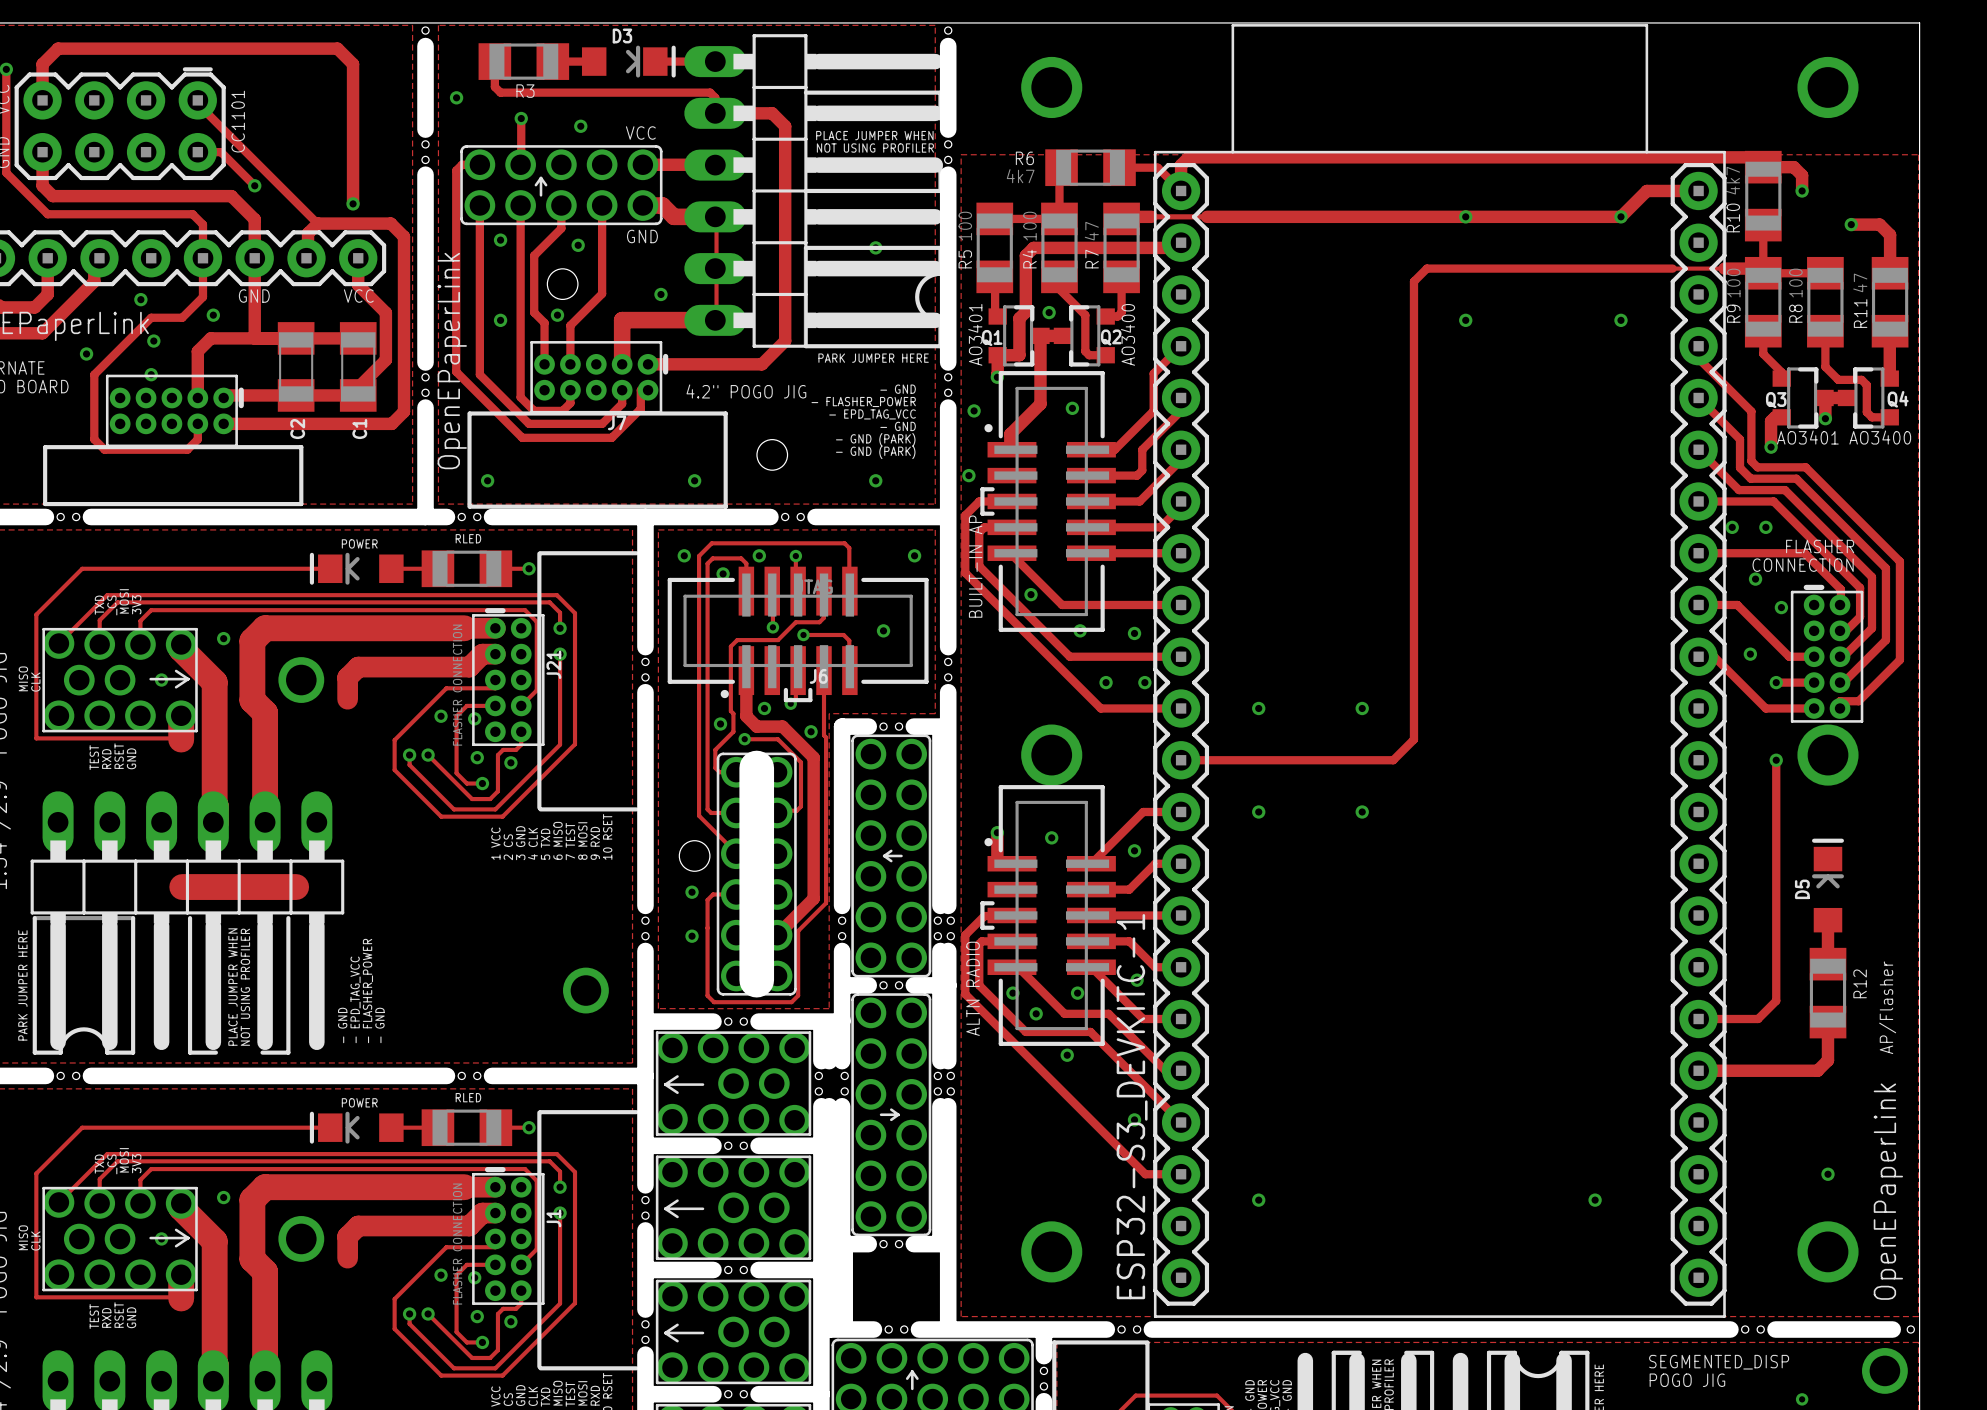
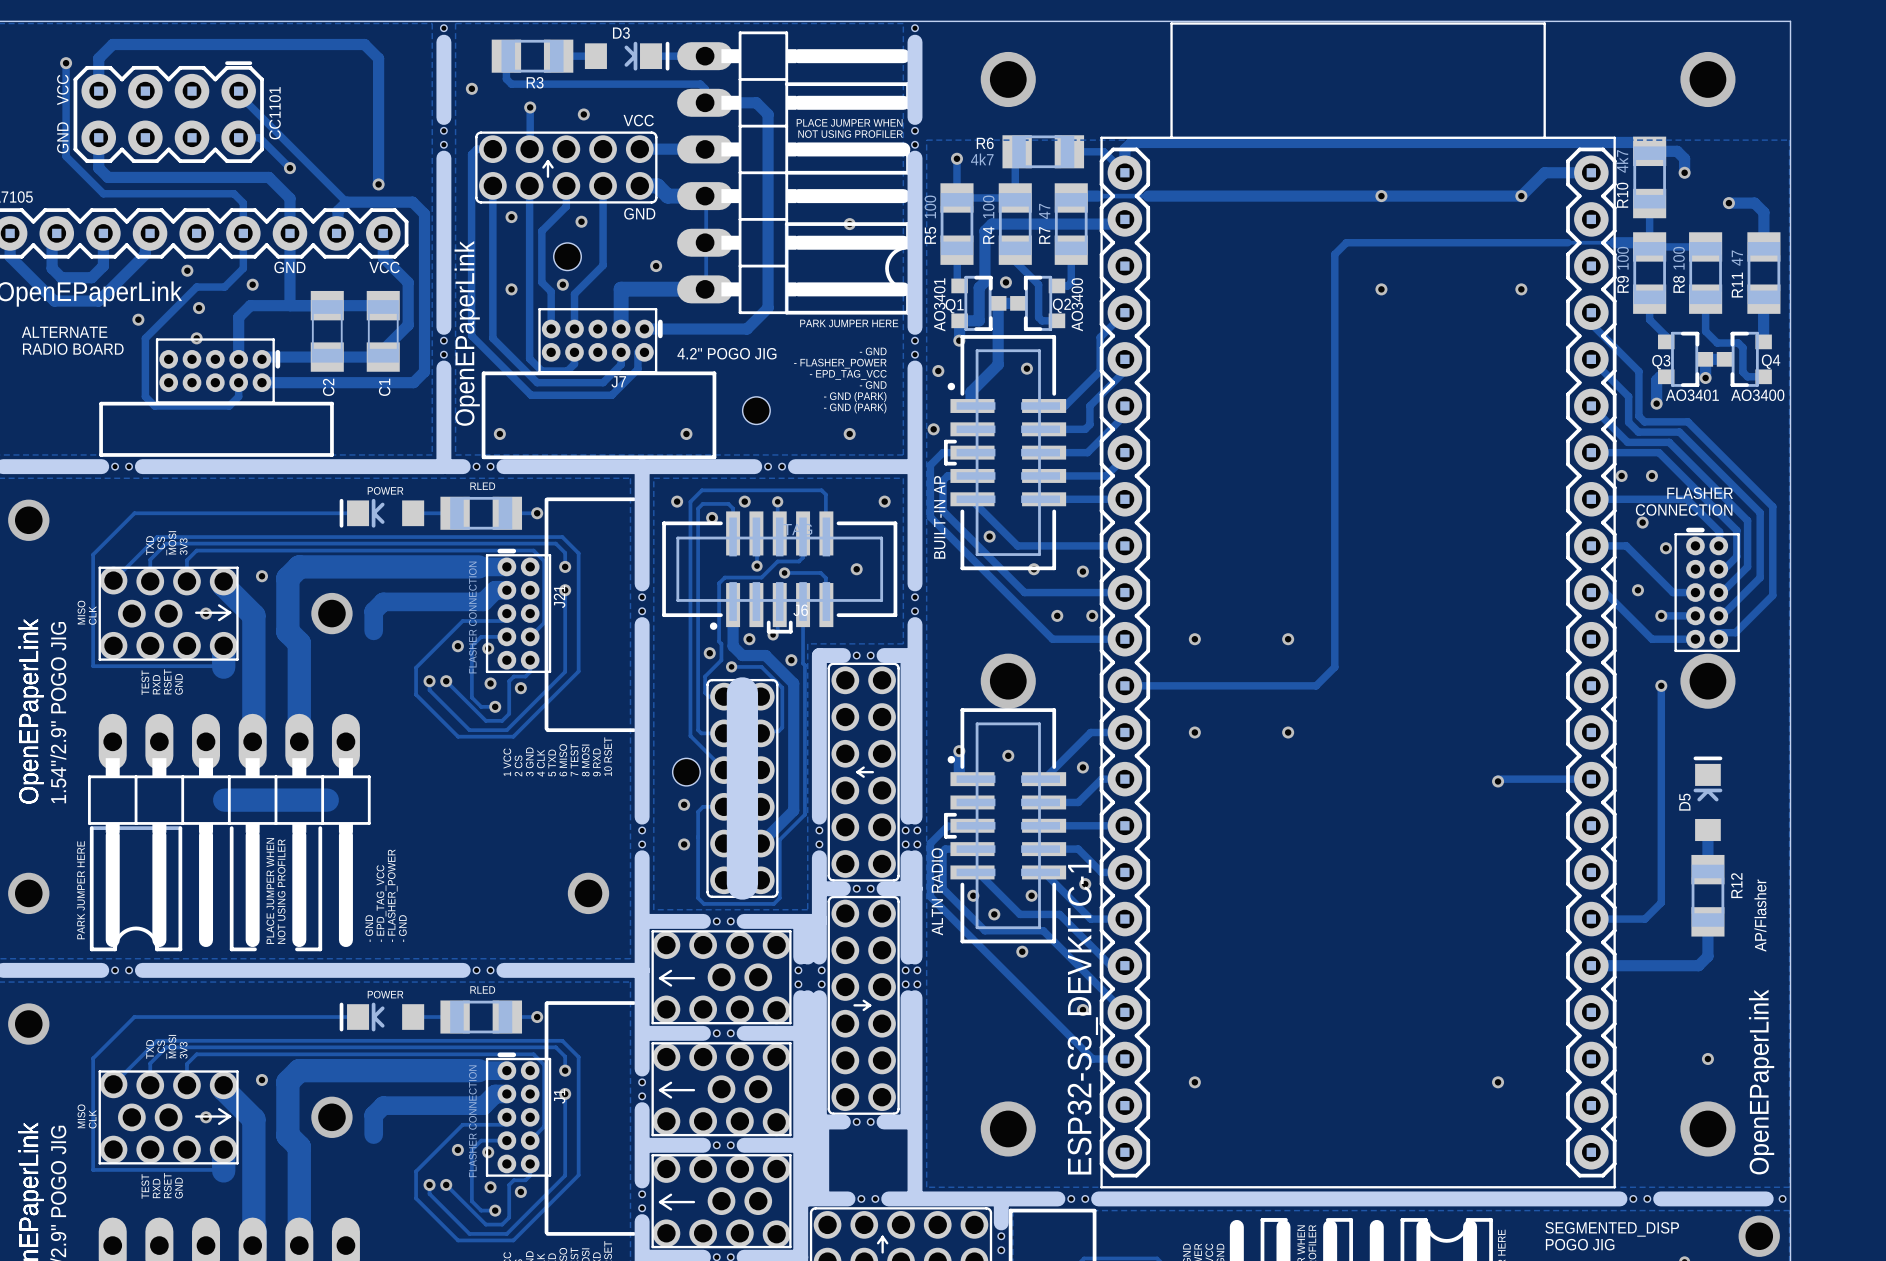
track: none -> (956, 158) (956, 197)
via: none -> (956, 158)
track: none -> (1591, 779) (1498, 779) (1498, 781)
via: none -> (1498, 781)

